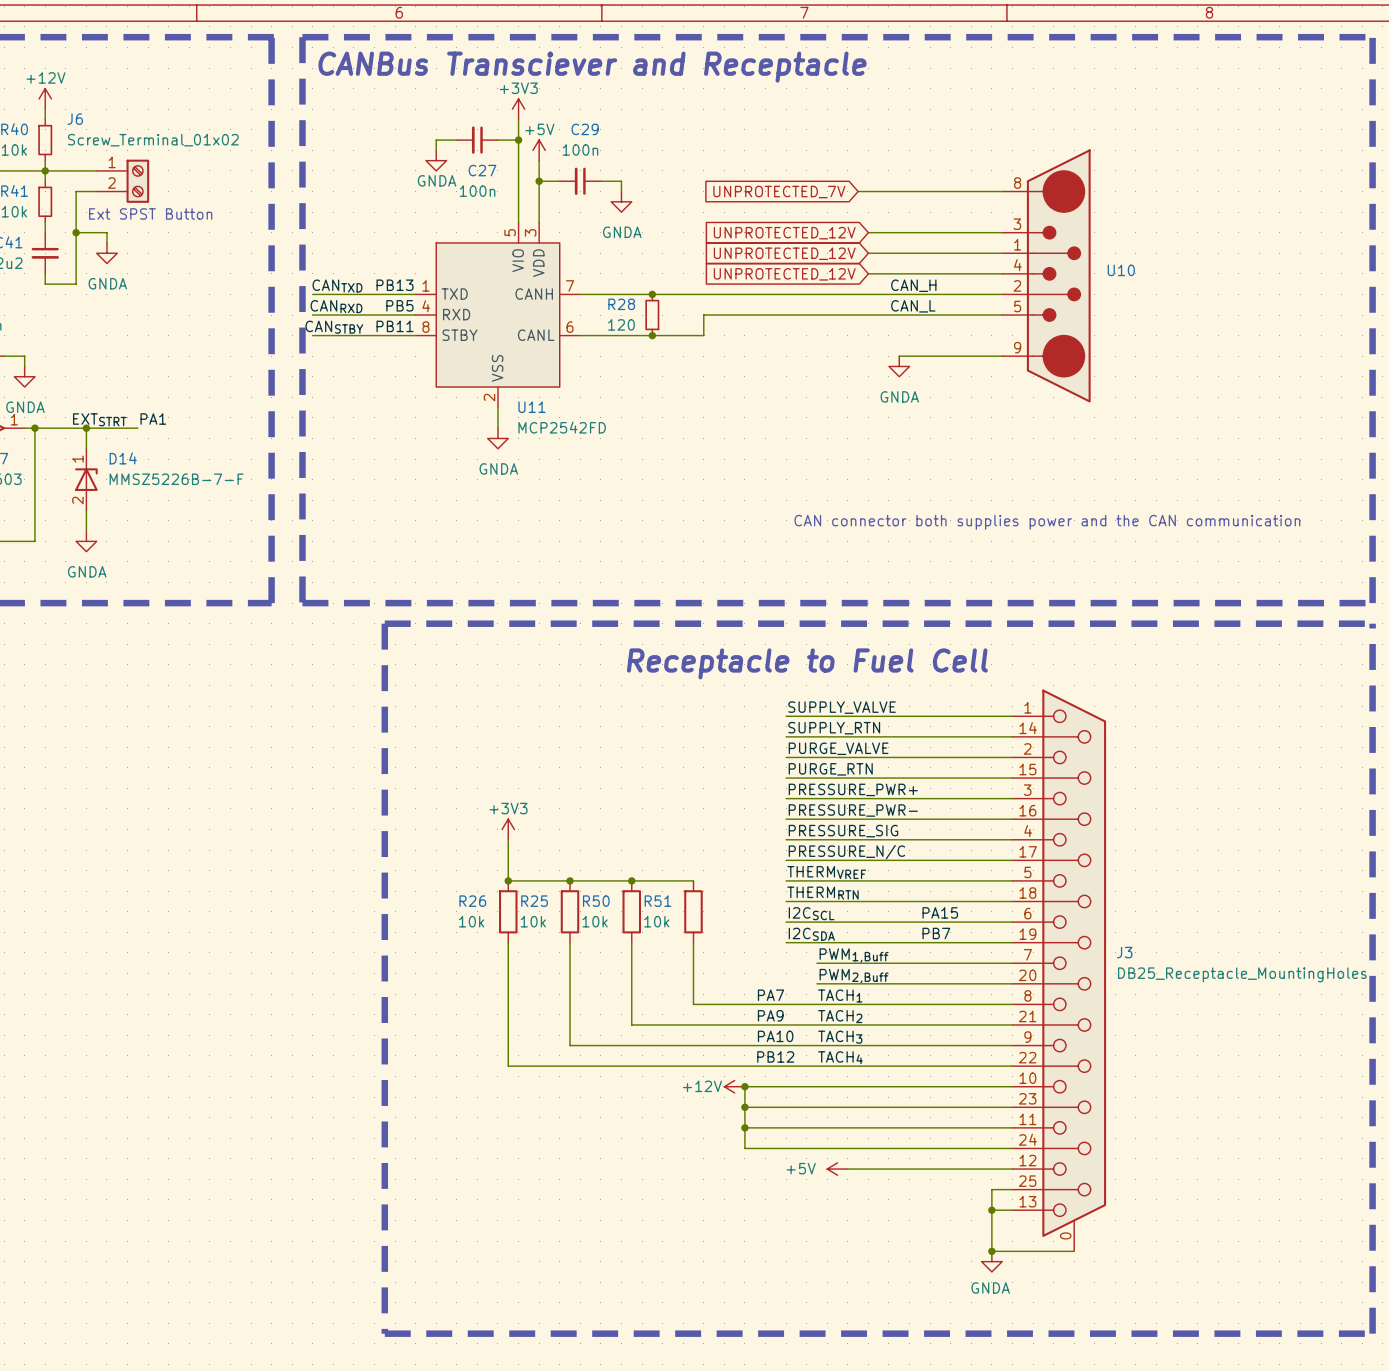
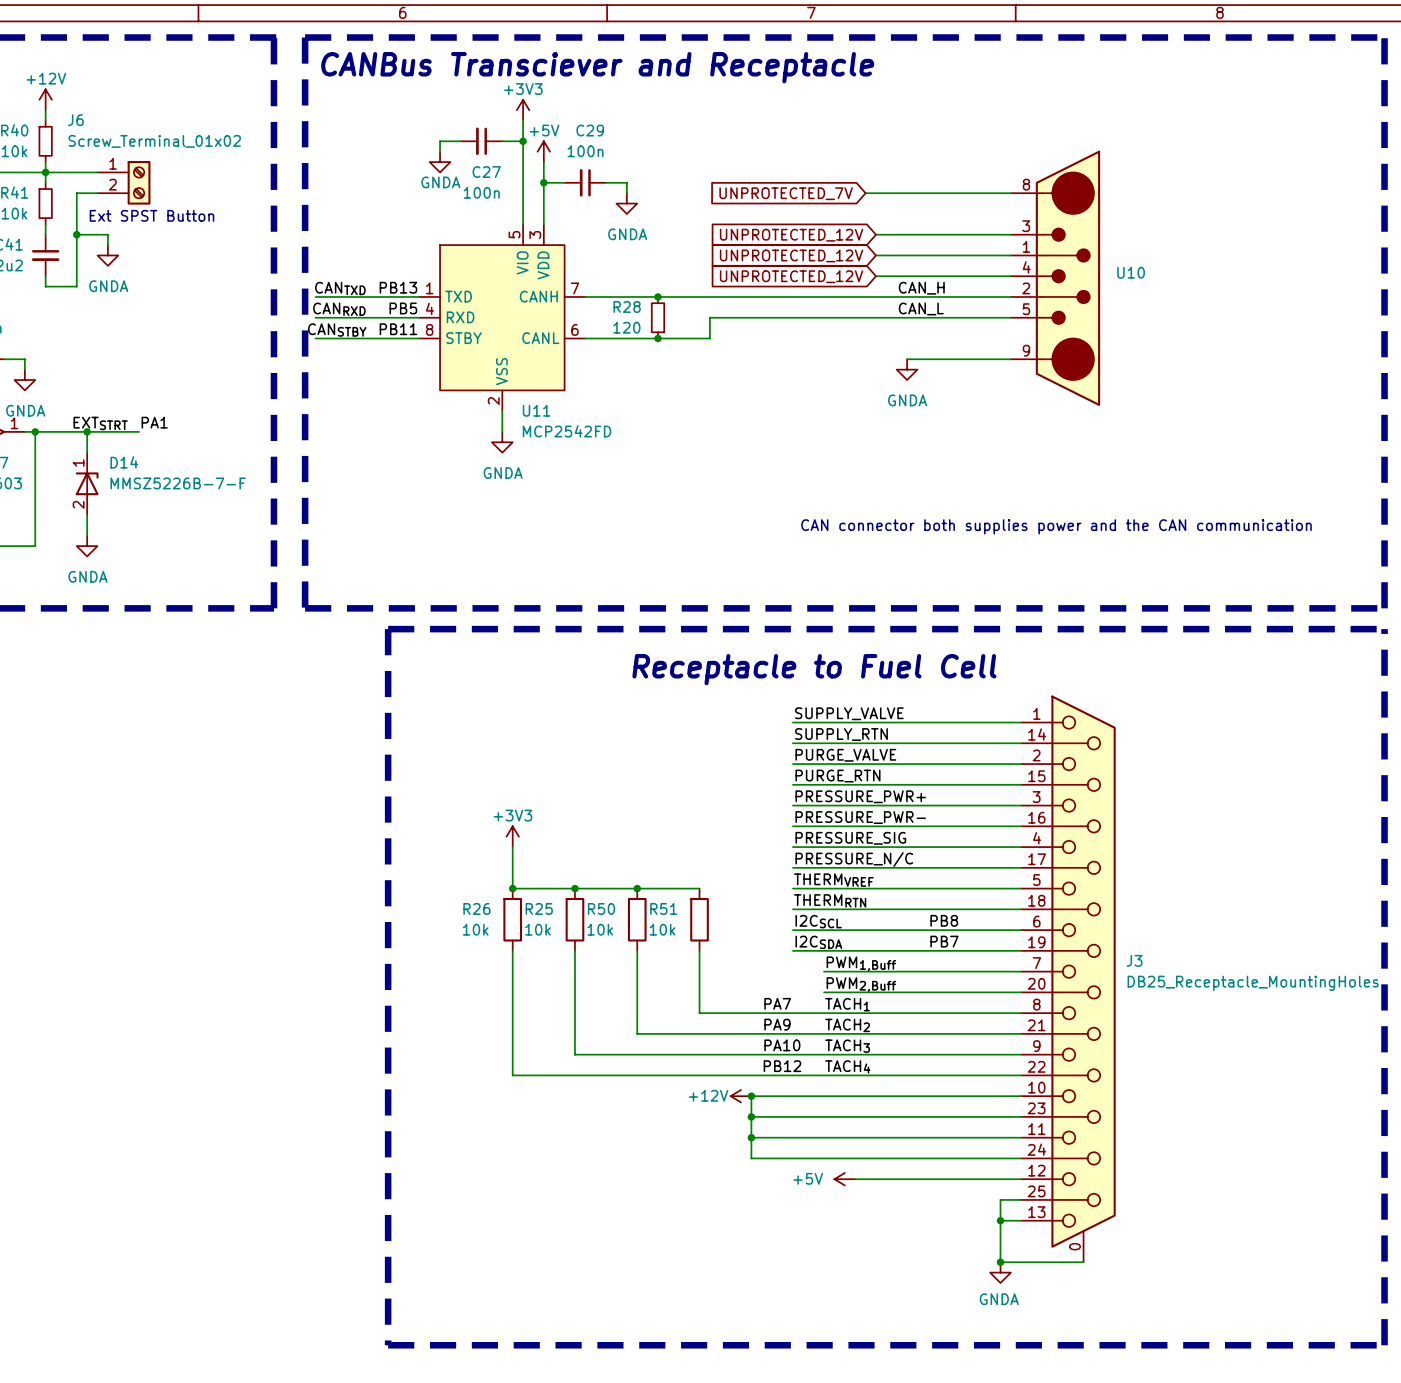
label: PA15 (940, 912) -> PB8 (944, 920)

